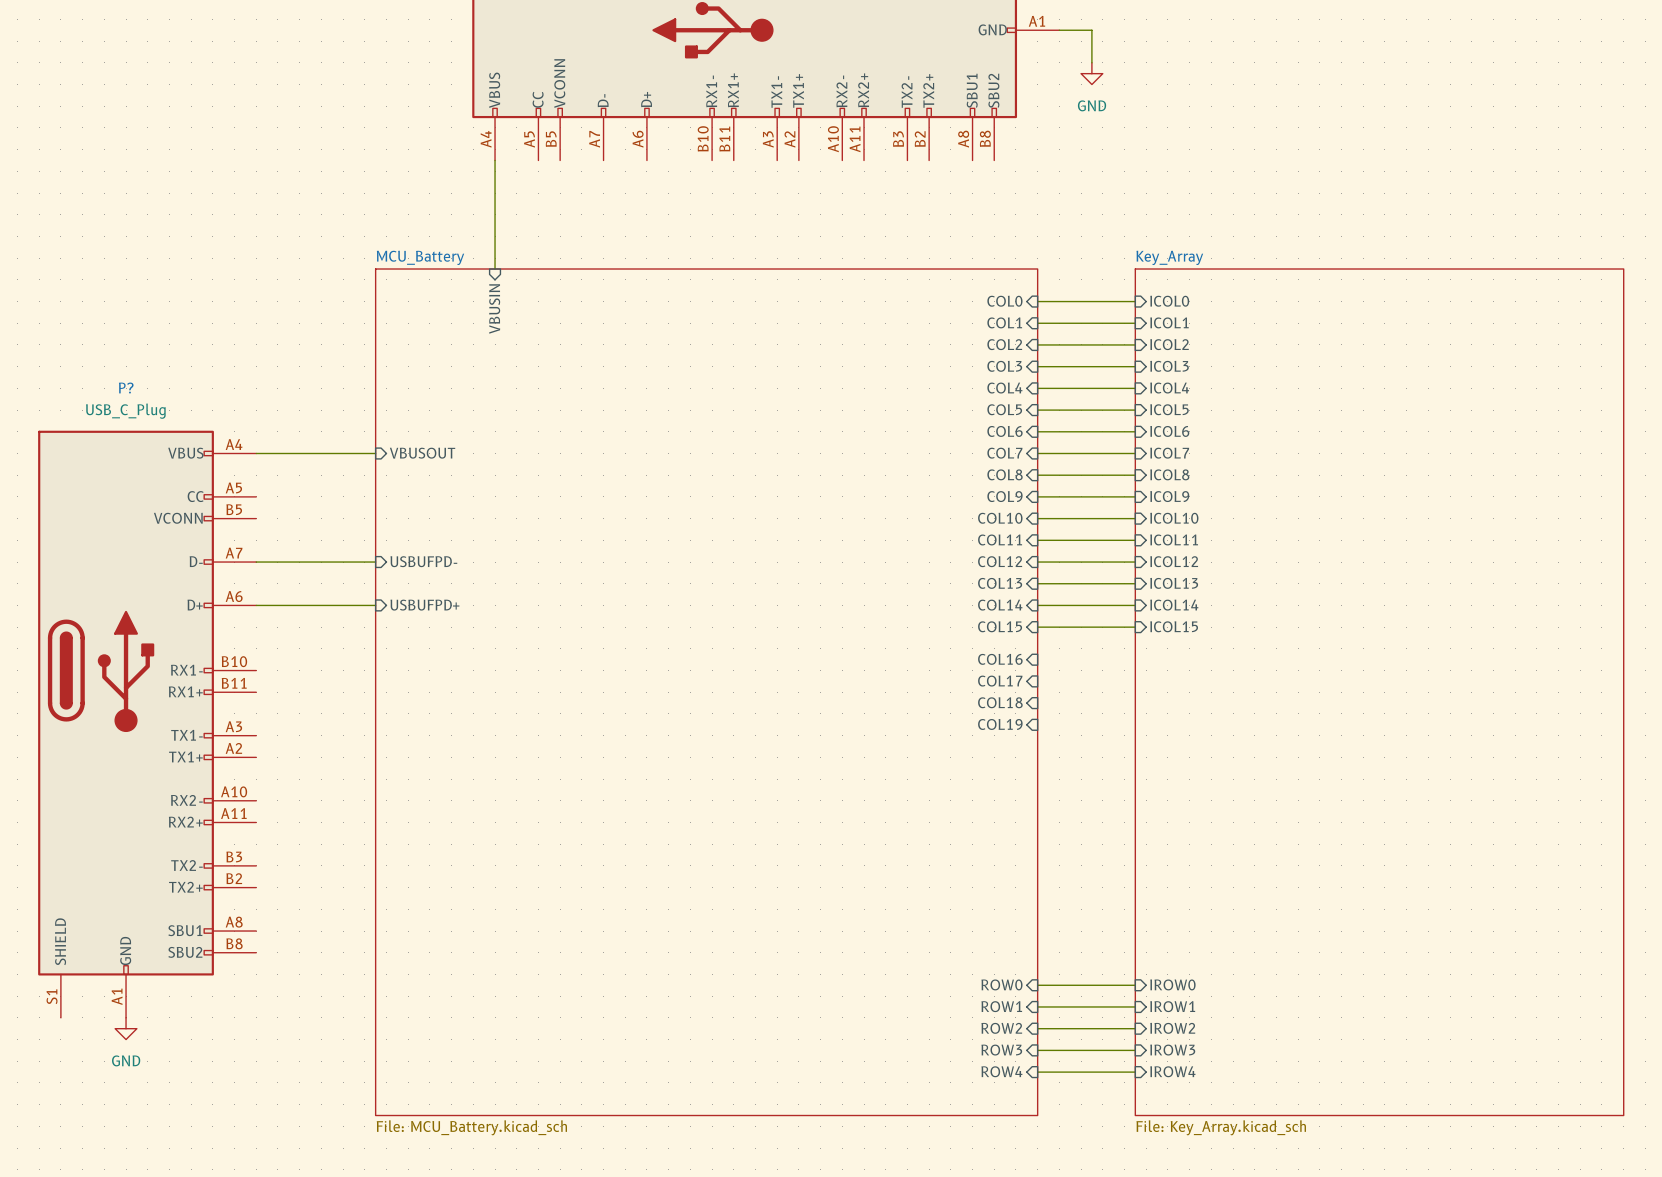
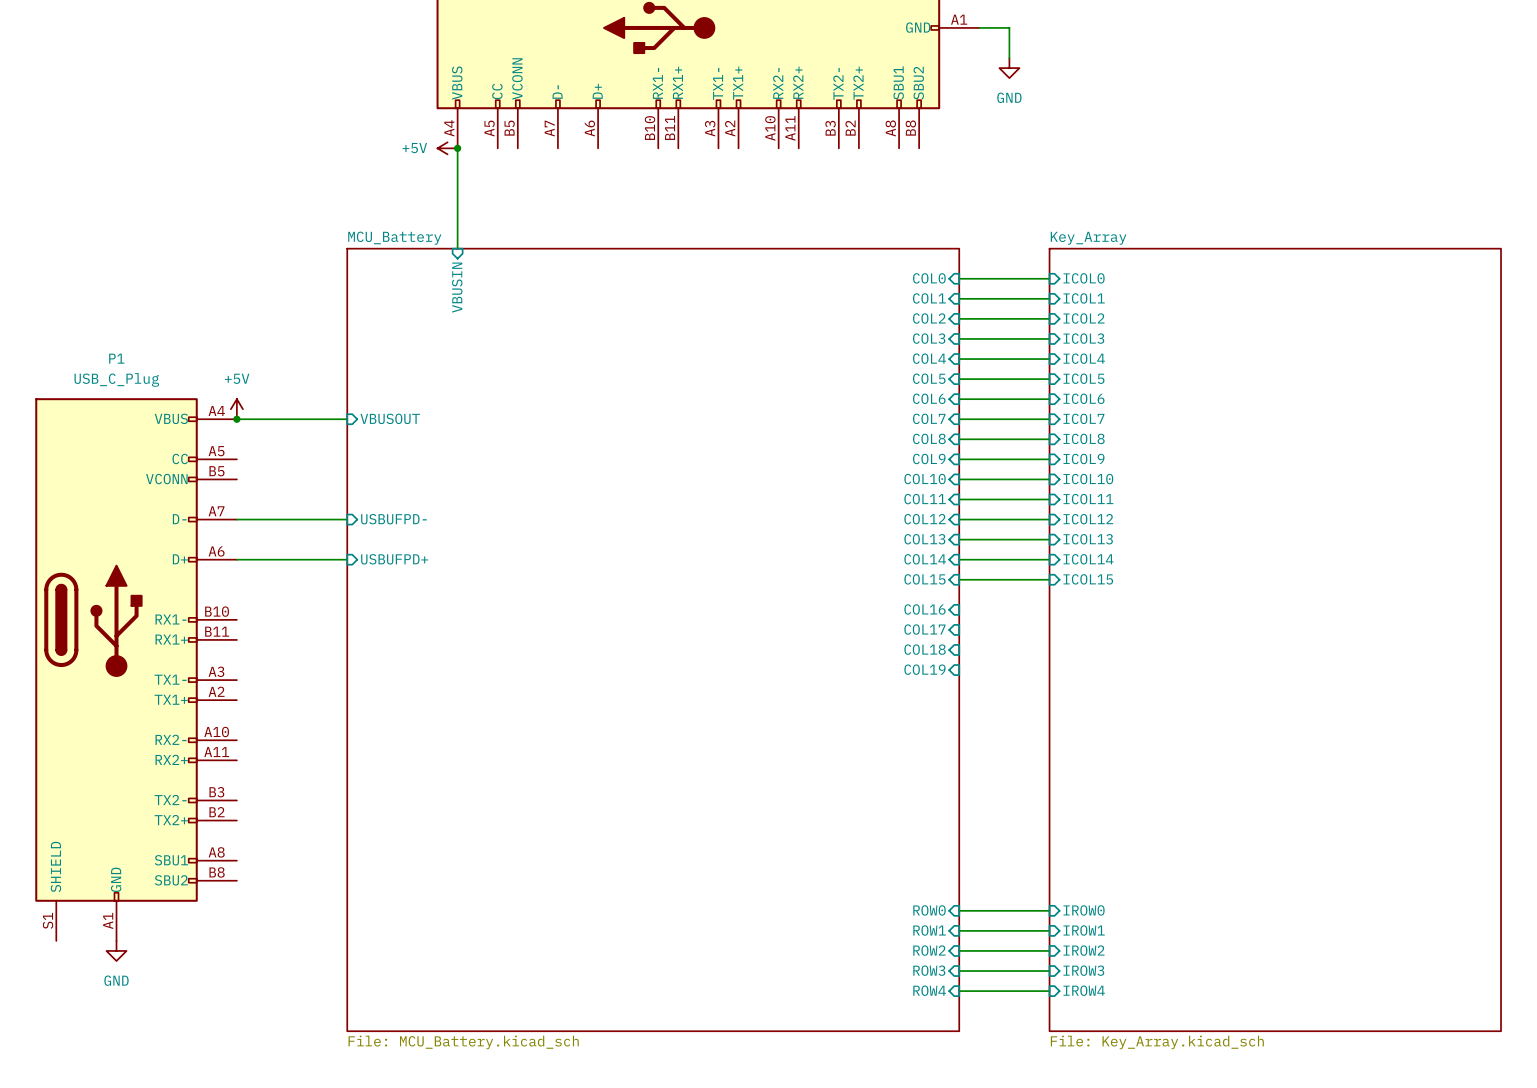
power symbol: none -> +5V (447, 148)
junction: none -> (457, 148)
P? name: P? (126, 388) -> P1 (116, 358)
power symbol: none -> +5V (236, 409)
junction: none -> (236, 419)

